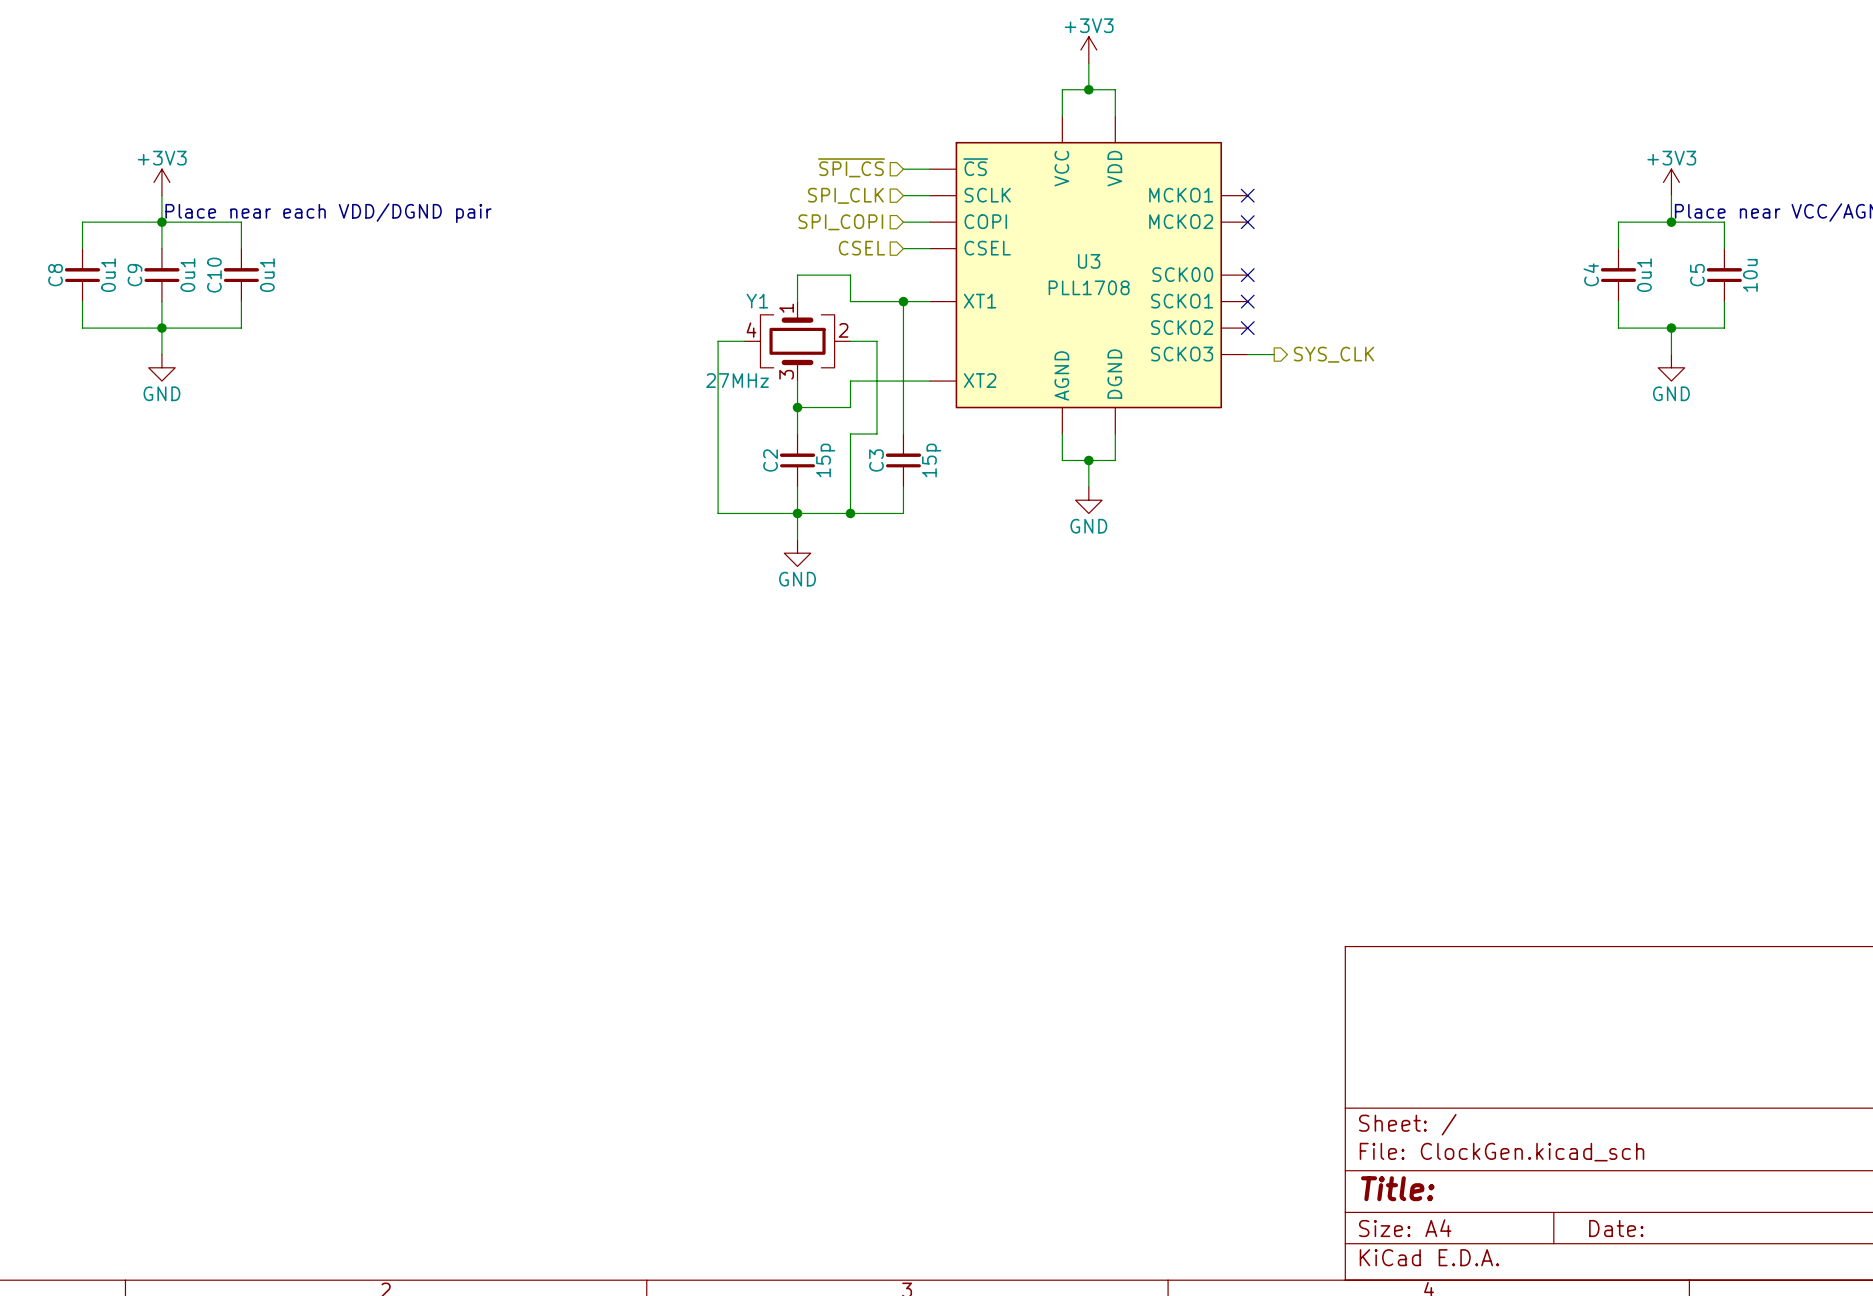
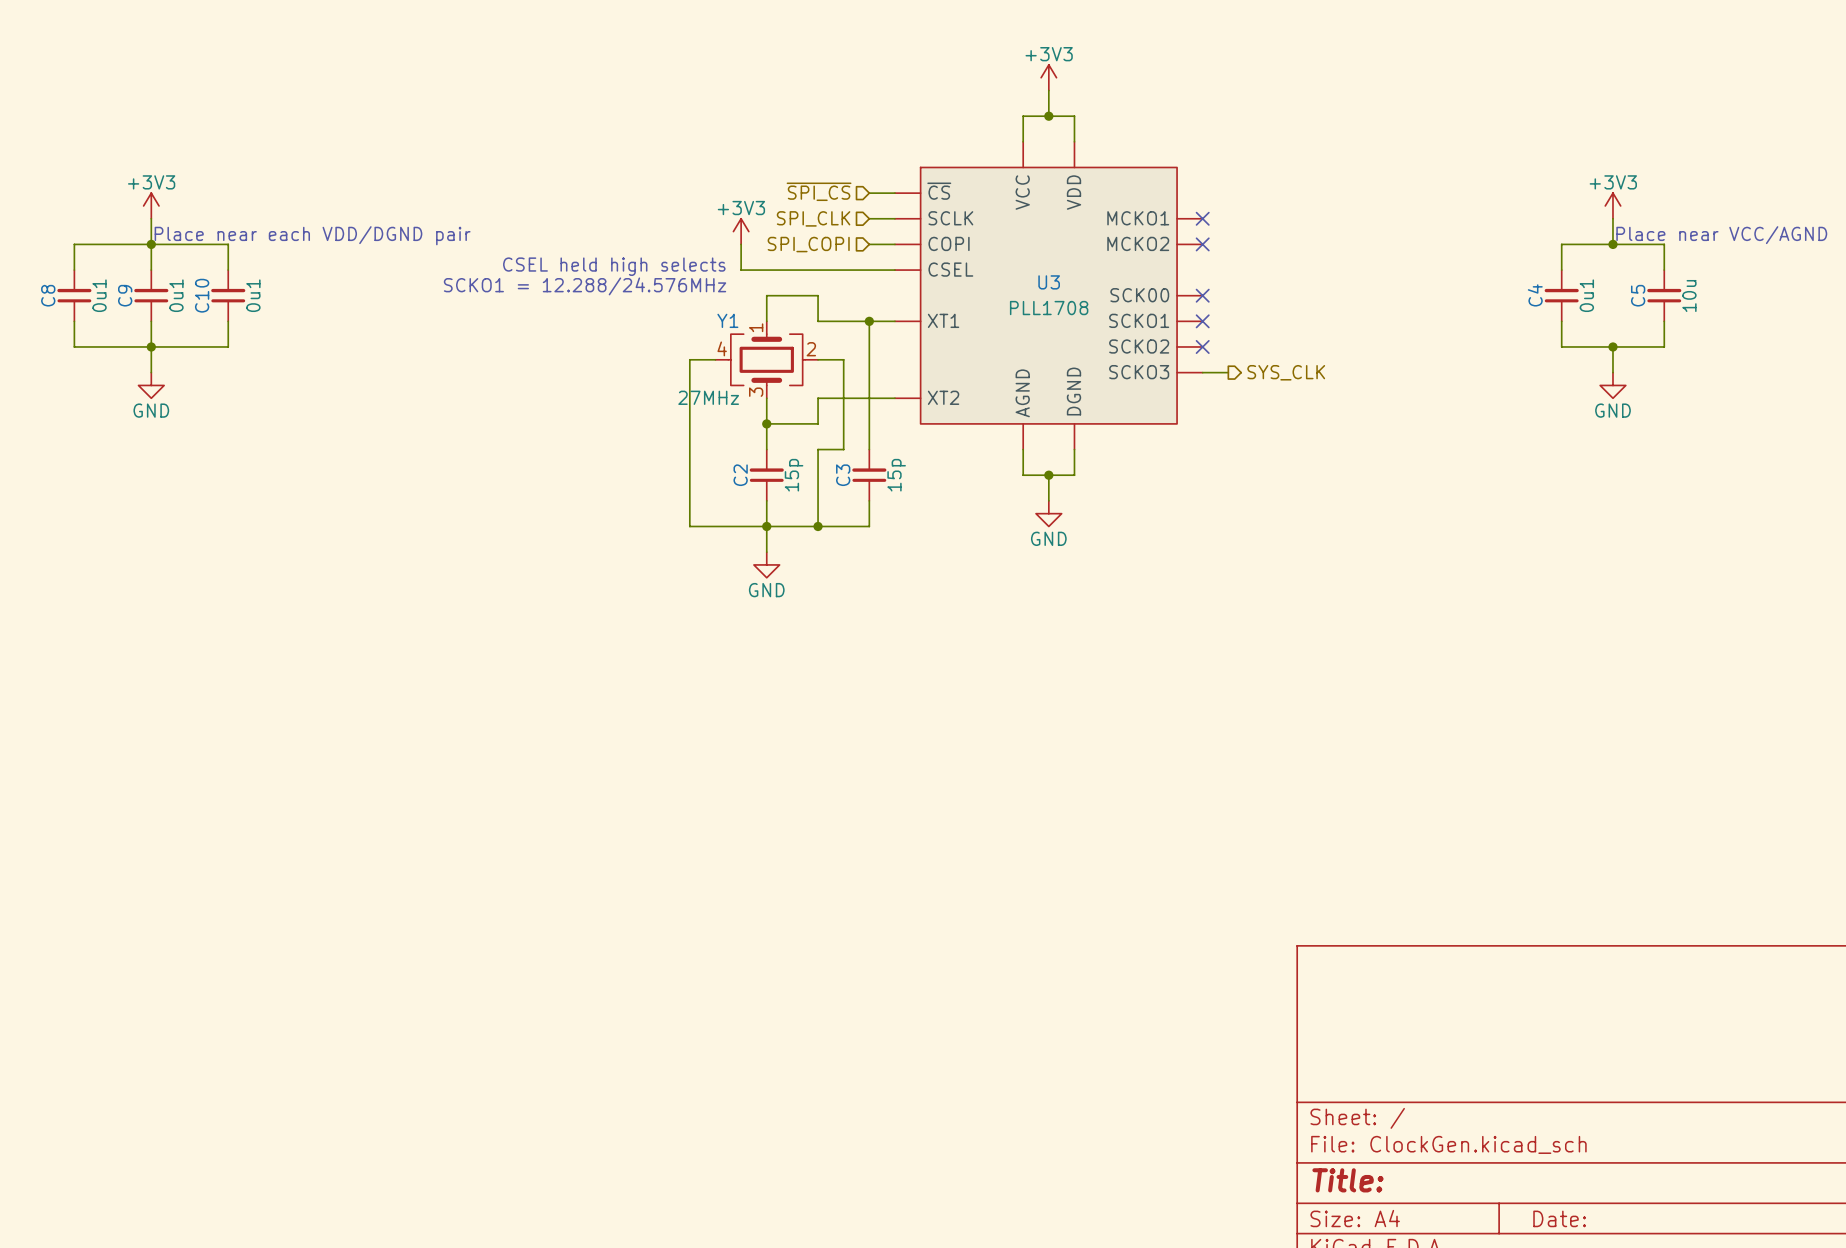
power symbol: none -> +3V3 (741, 231)
wire: none -> (741, 244) (741, 270) (869, 270)
text: none -> CSEL held high selects (614, 266)
hierarchical label: CSEL (861, 248) -> none
text: none -> SCKO1 = 12.288/24.576MHz (585, 286)

